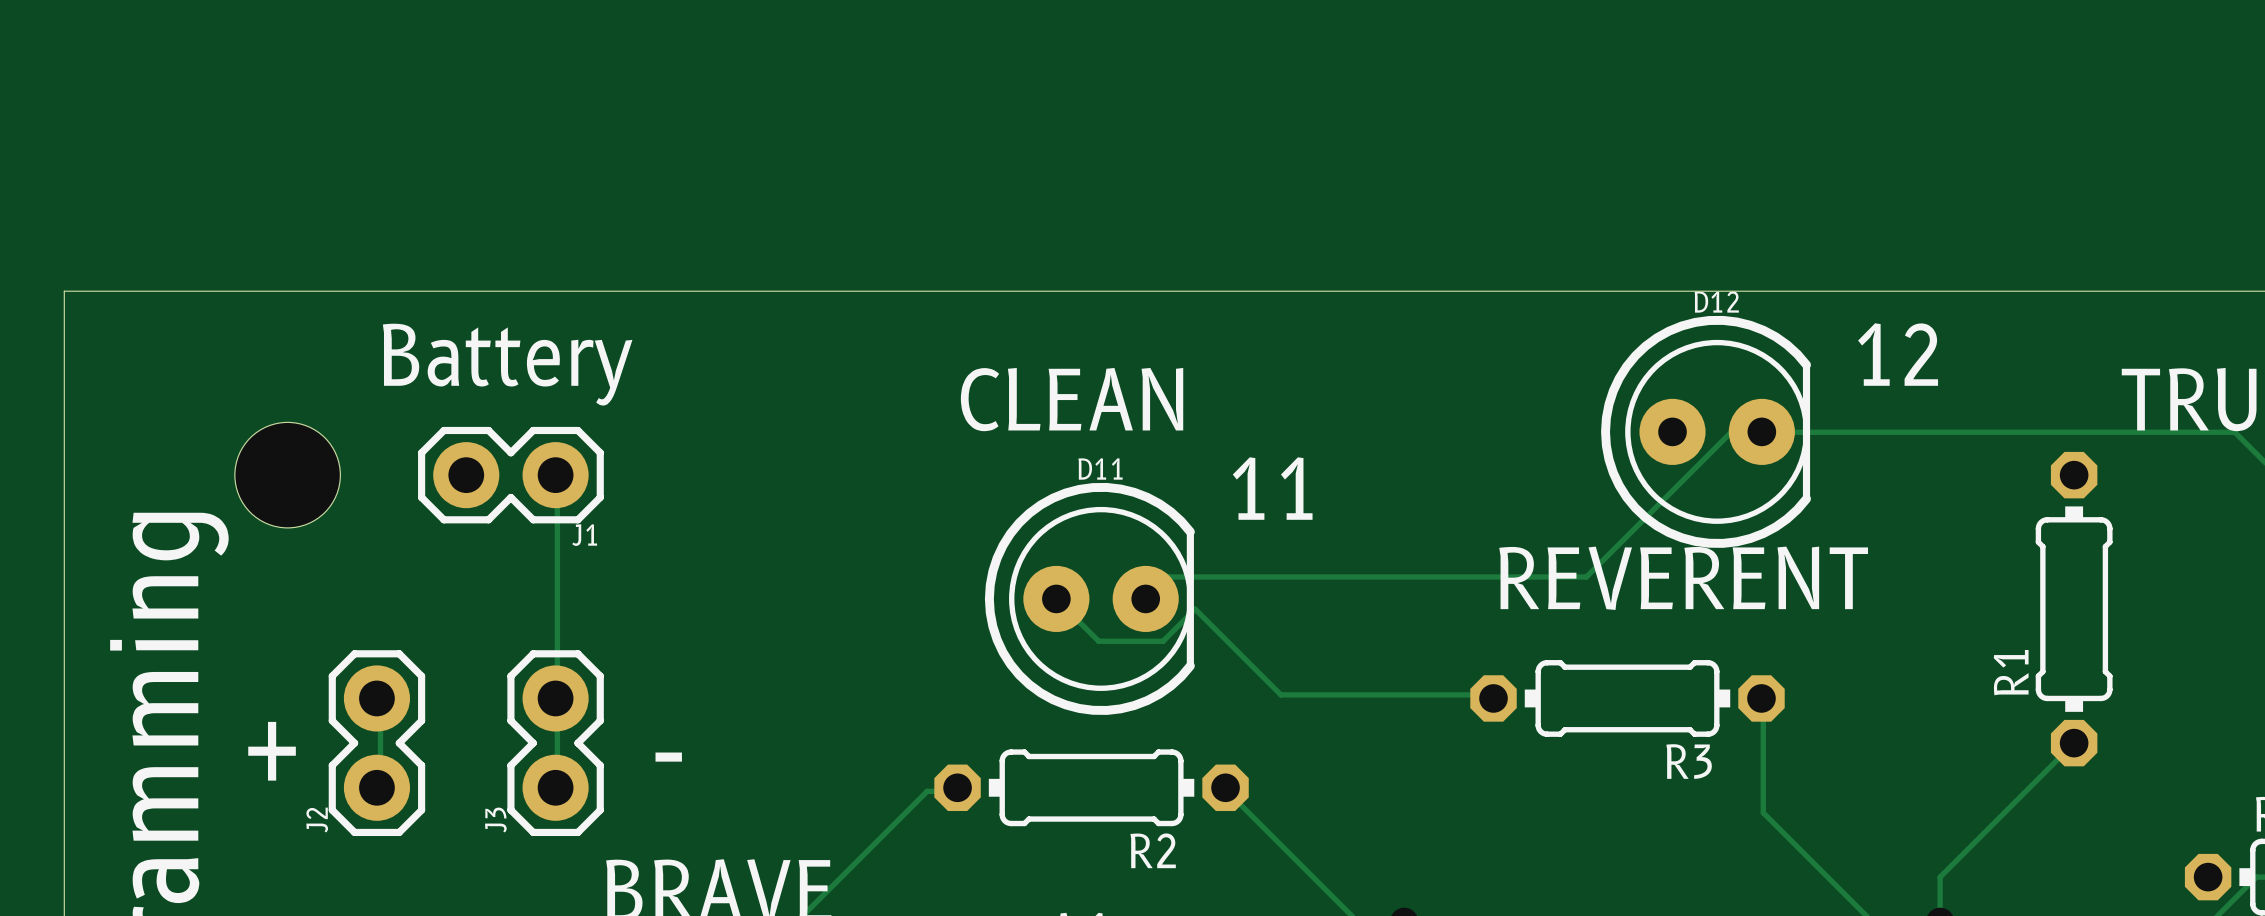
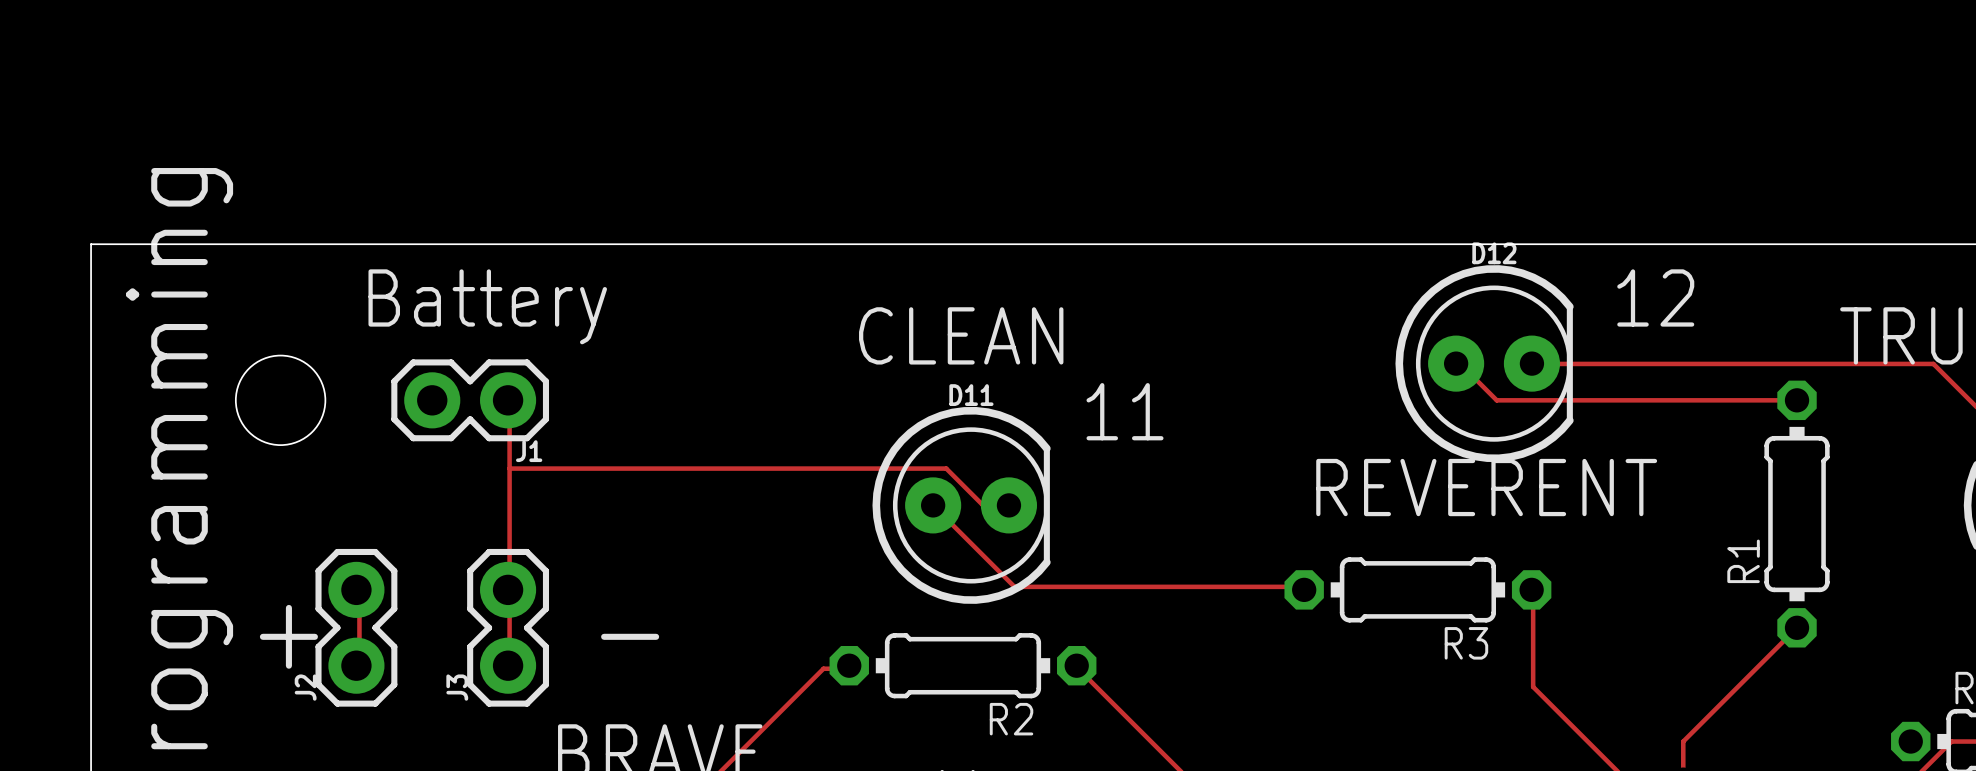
track: none -> (1456, 363) (1460, 363) (1496, 400) (1797, 400)
track: (1761, 431) (1731, 432) (1586, 576) (1168, 576) (1145, 598) -> (509, 468) (946, 468) (982, 504) (1008, 505)
track: (1098, 641) (1163, 641) (1195, 609) (1280, 694) -> (969, 541) (1014, 586) (1123, 586)

